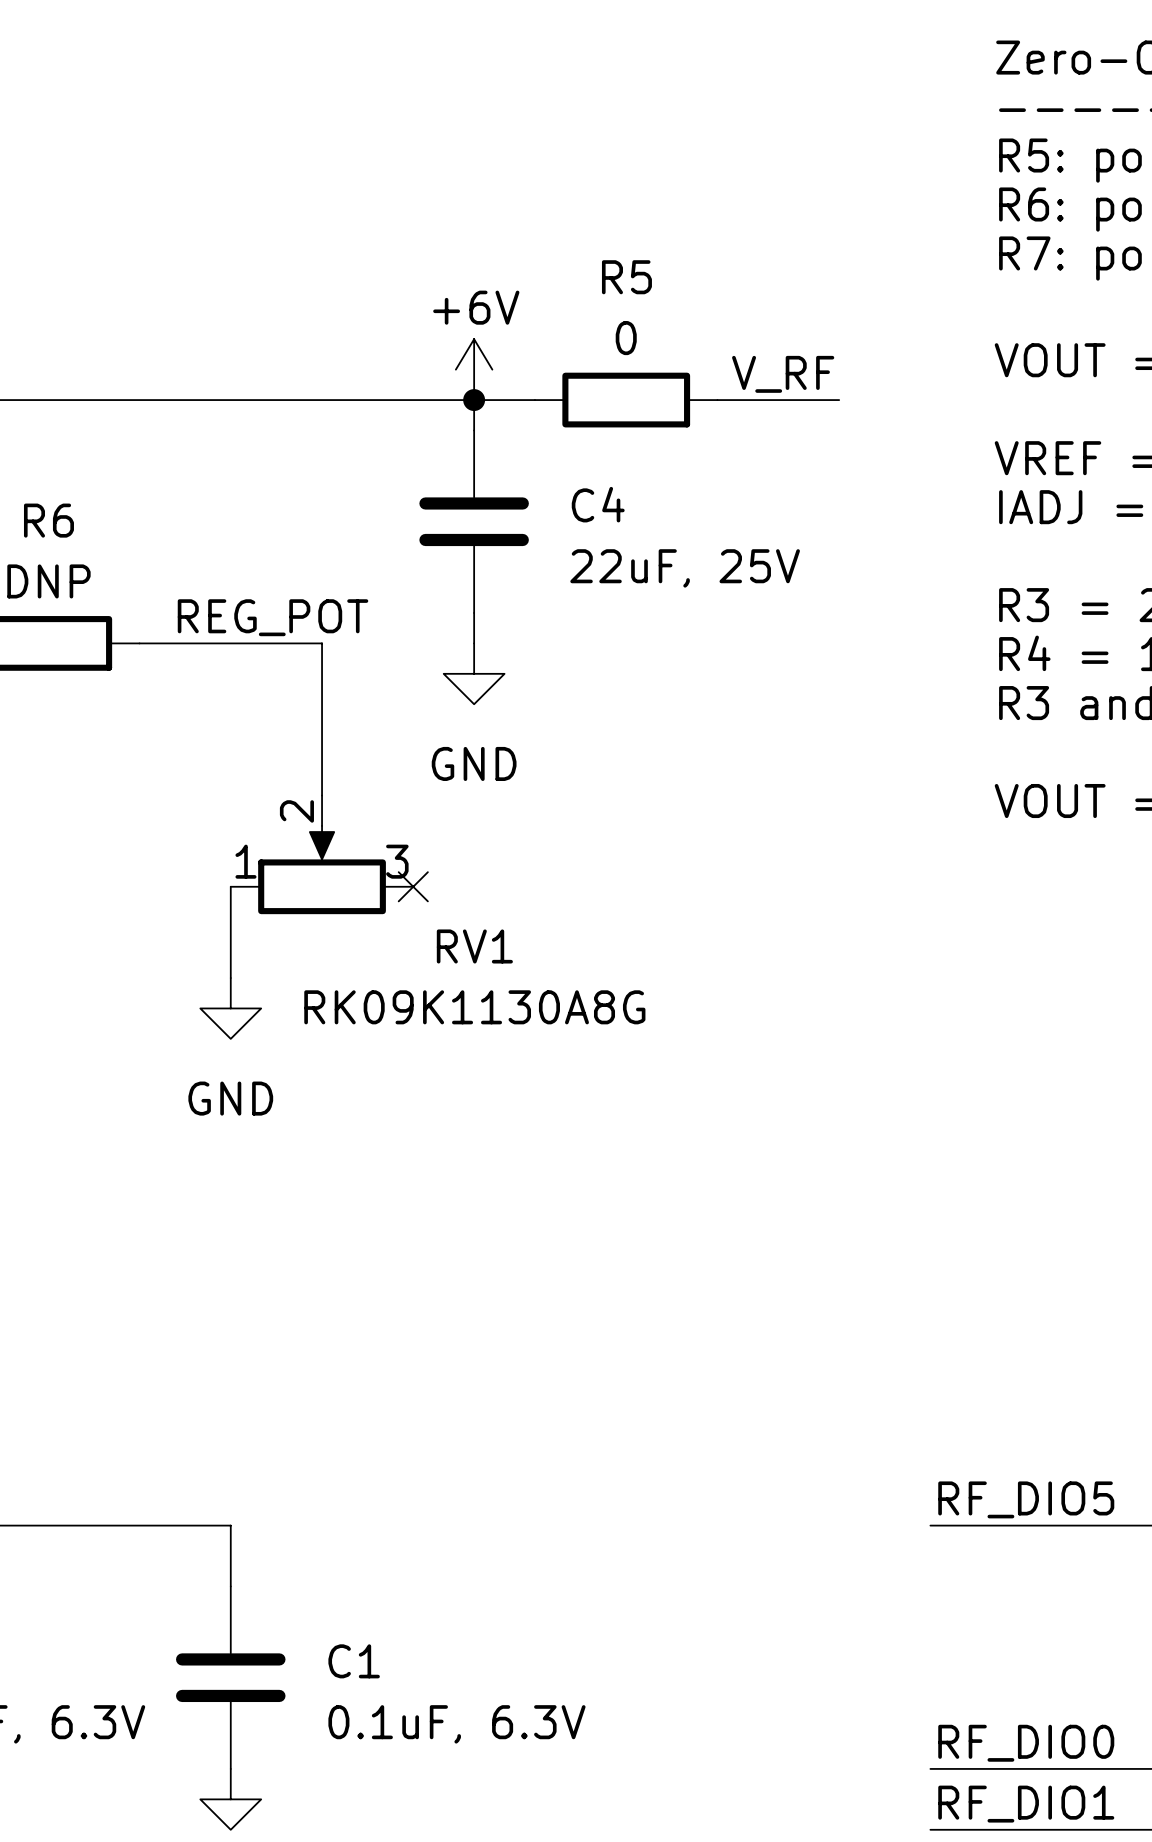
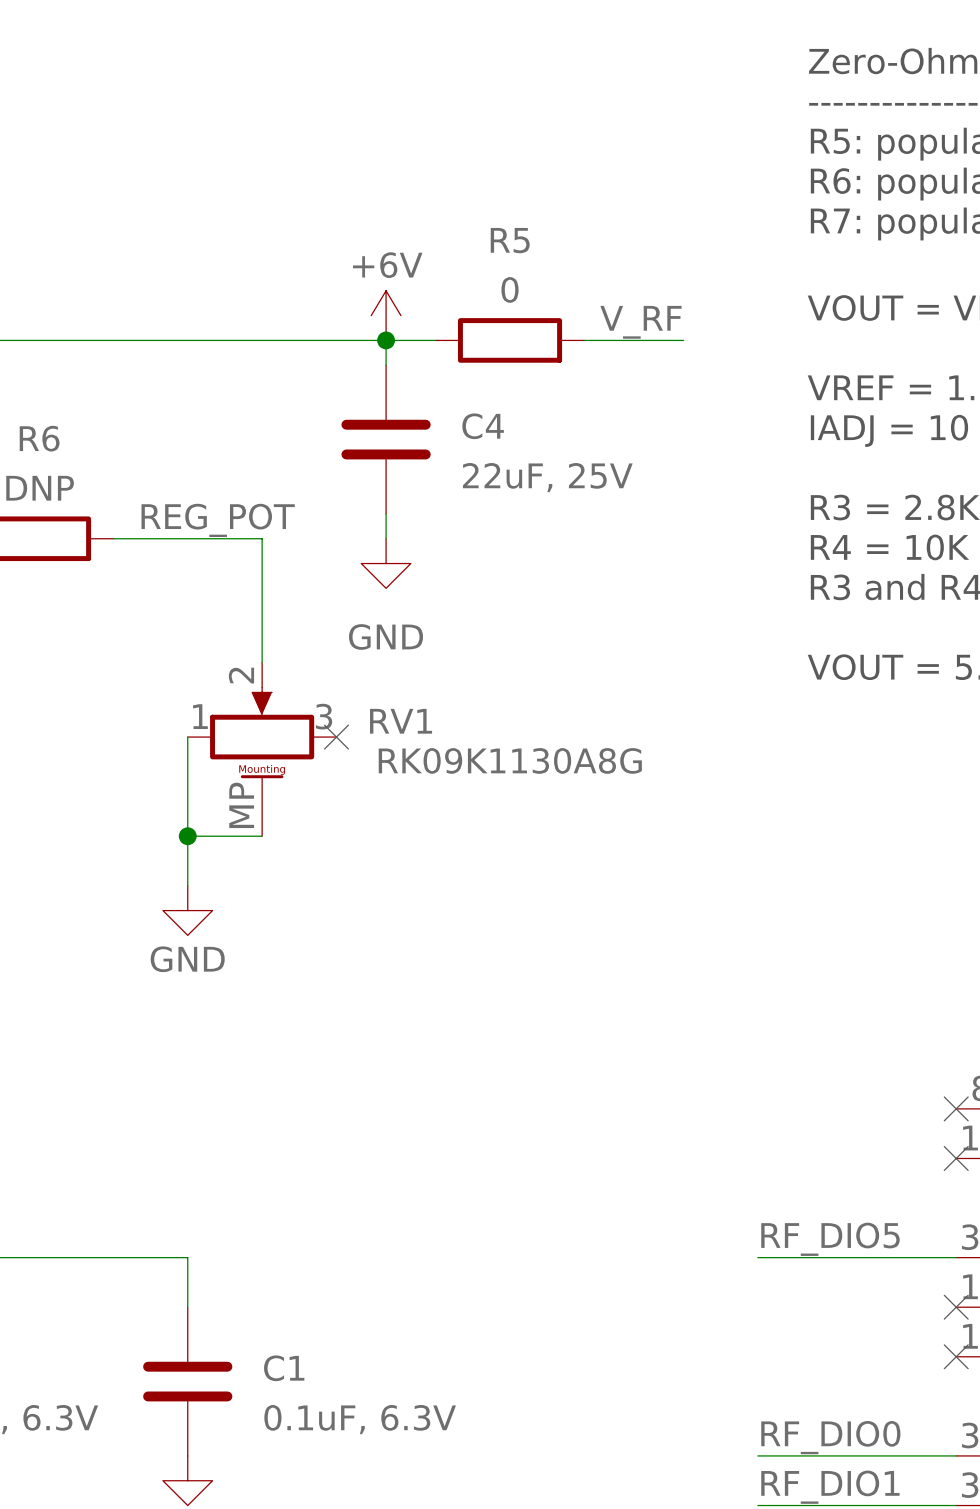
RV1 symbol: [230, 795, 414, 915] -> [187, 662, 337, 837]
RV1 name position: RV1 (474, 946) -> RV1 (401, 721)
wire: none -> (187, 811) (187, 885)
RV1 value position: RK09K1130A8G (474, 1007) -> RK09K1130A8G (510, 760)
wire: none -> (187, 836) (262, 836)
power symbol position: GND (230, 1008) -> GND (187, 910)
junction: none -> (187, 836)
power symbol text position: GND (230, 1098) -> GND (187, 959)

